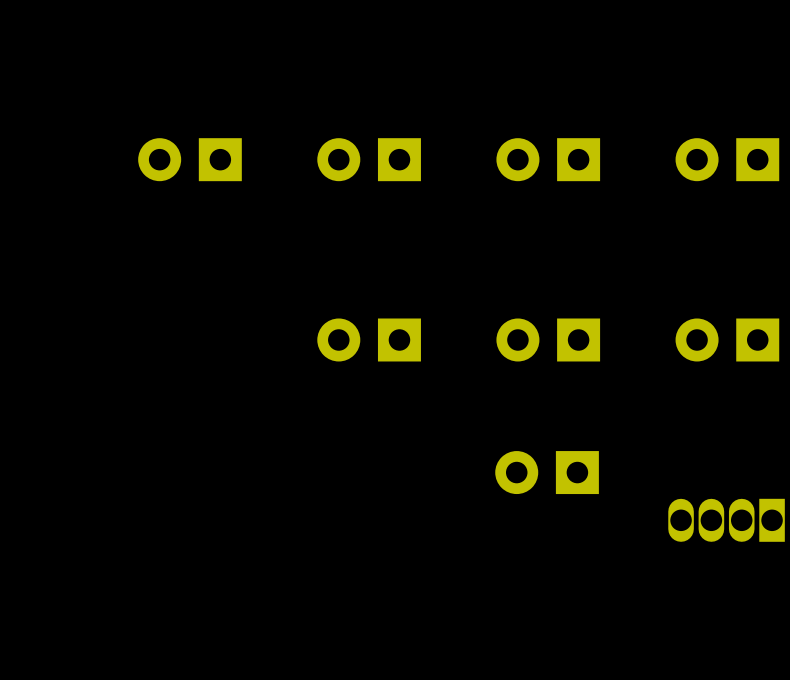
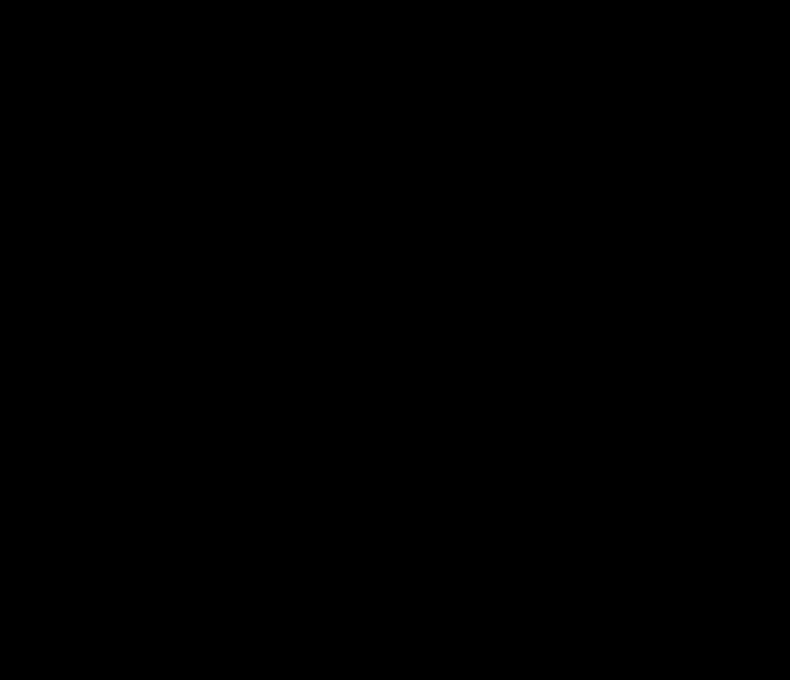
part: (189, 159) -> none
part: (369, 159) -> none
part: (548, 159) -> none
part: (727, 159) -> none
part: (369, 339) -> none
part: (548, 339) -> none
part: (727, 339) -> none
part: (547, 472) -> none
part: (726, 520) -> none

